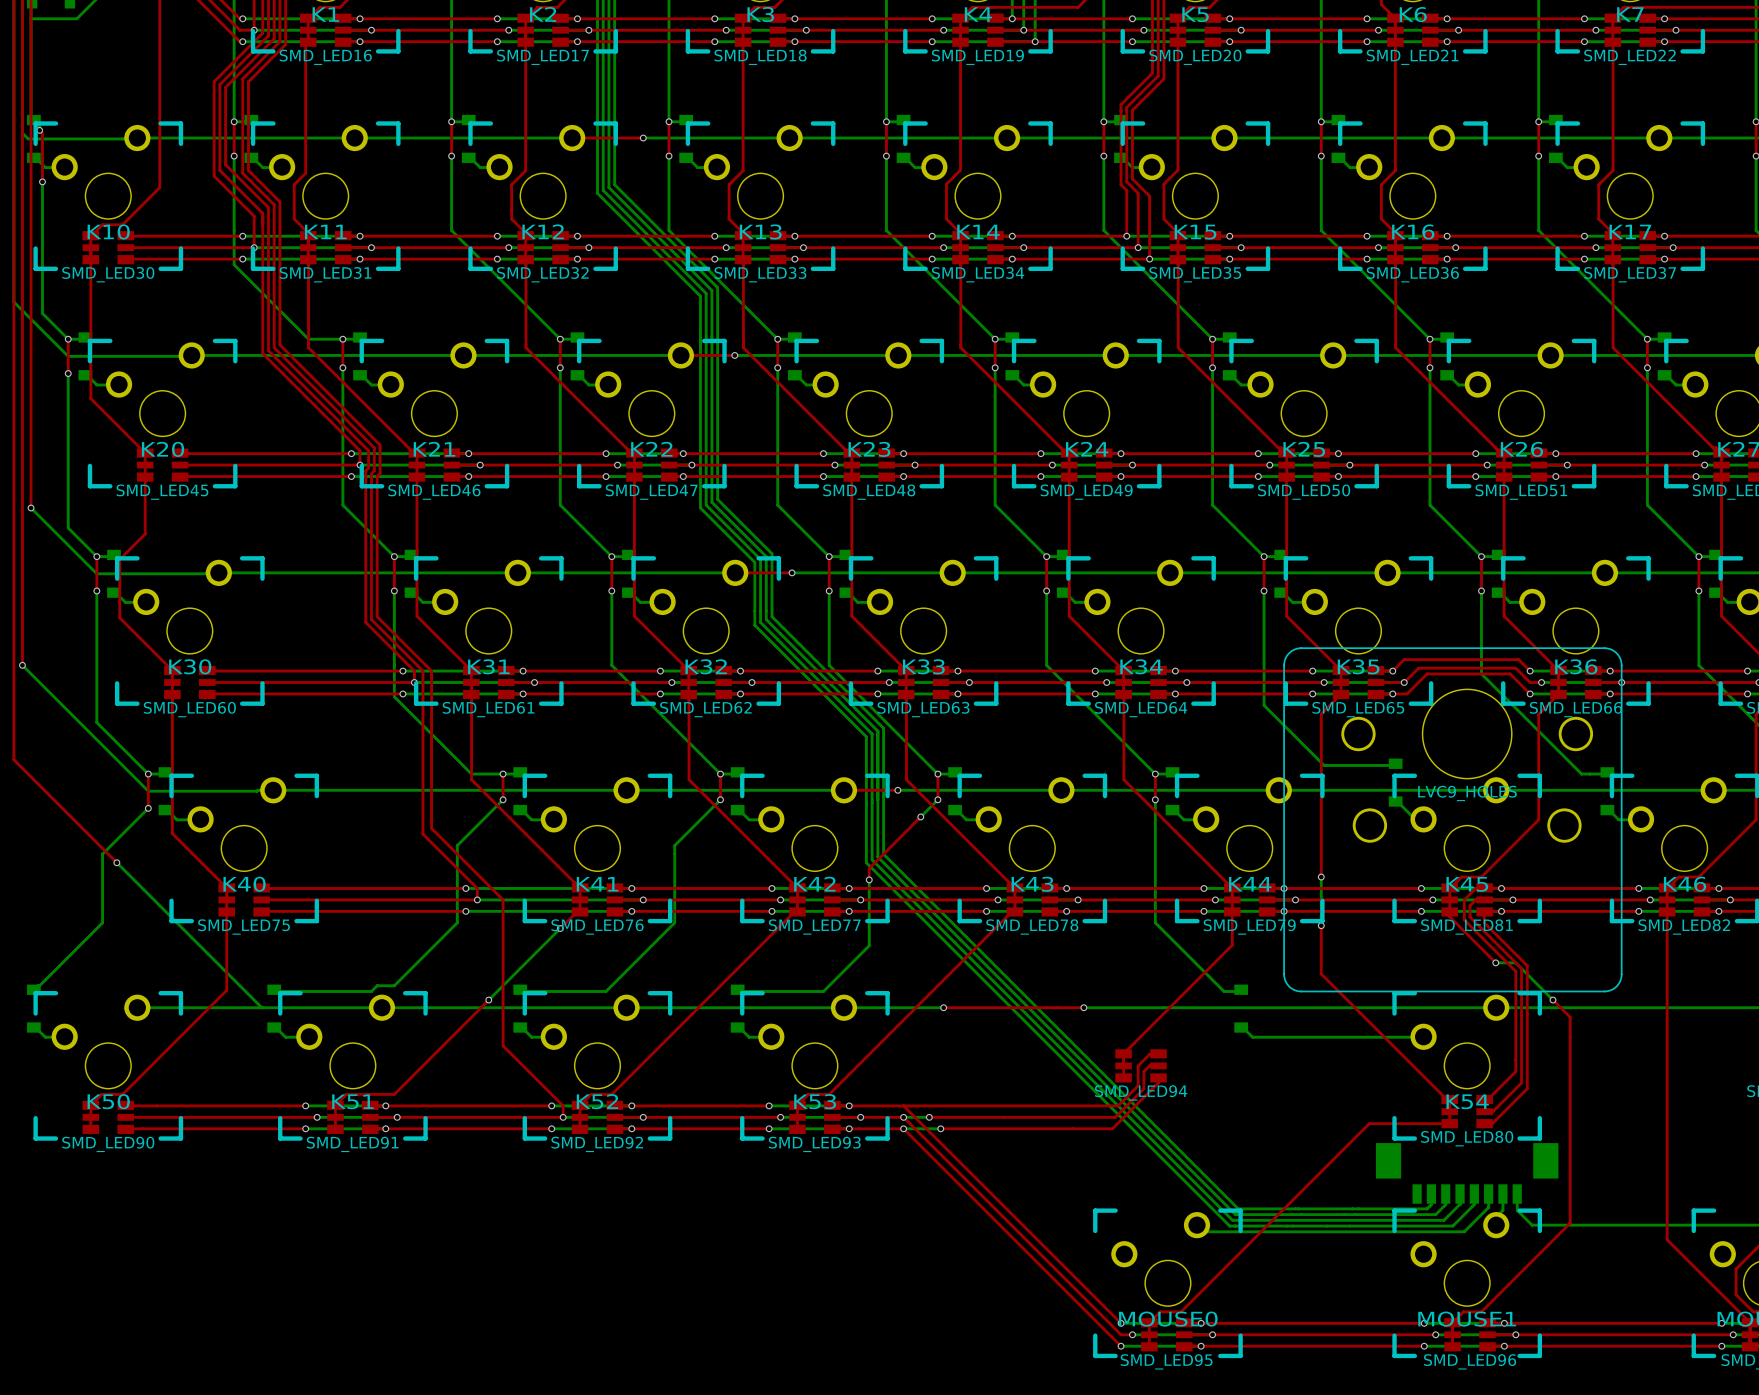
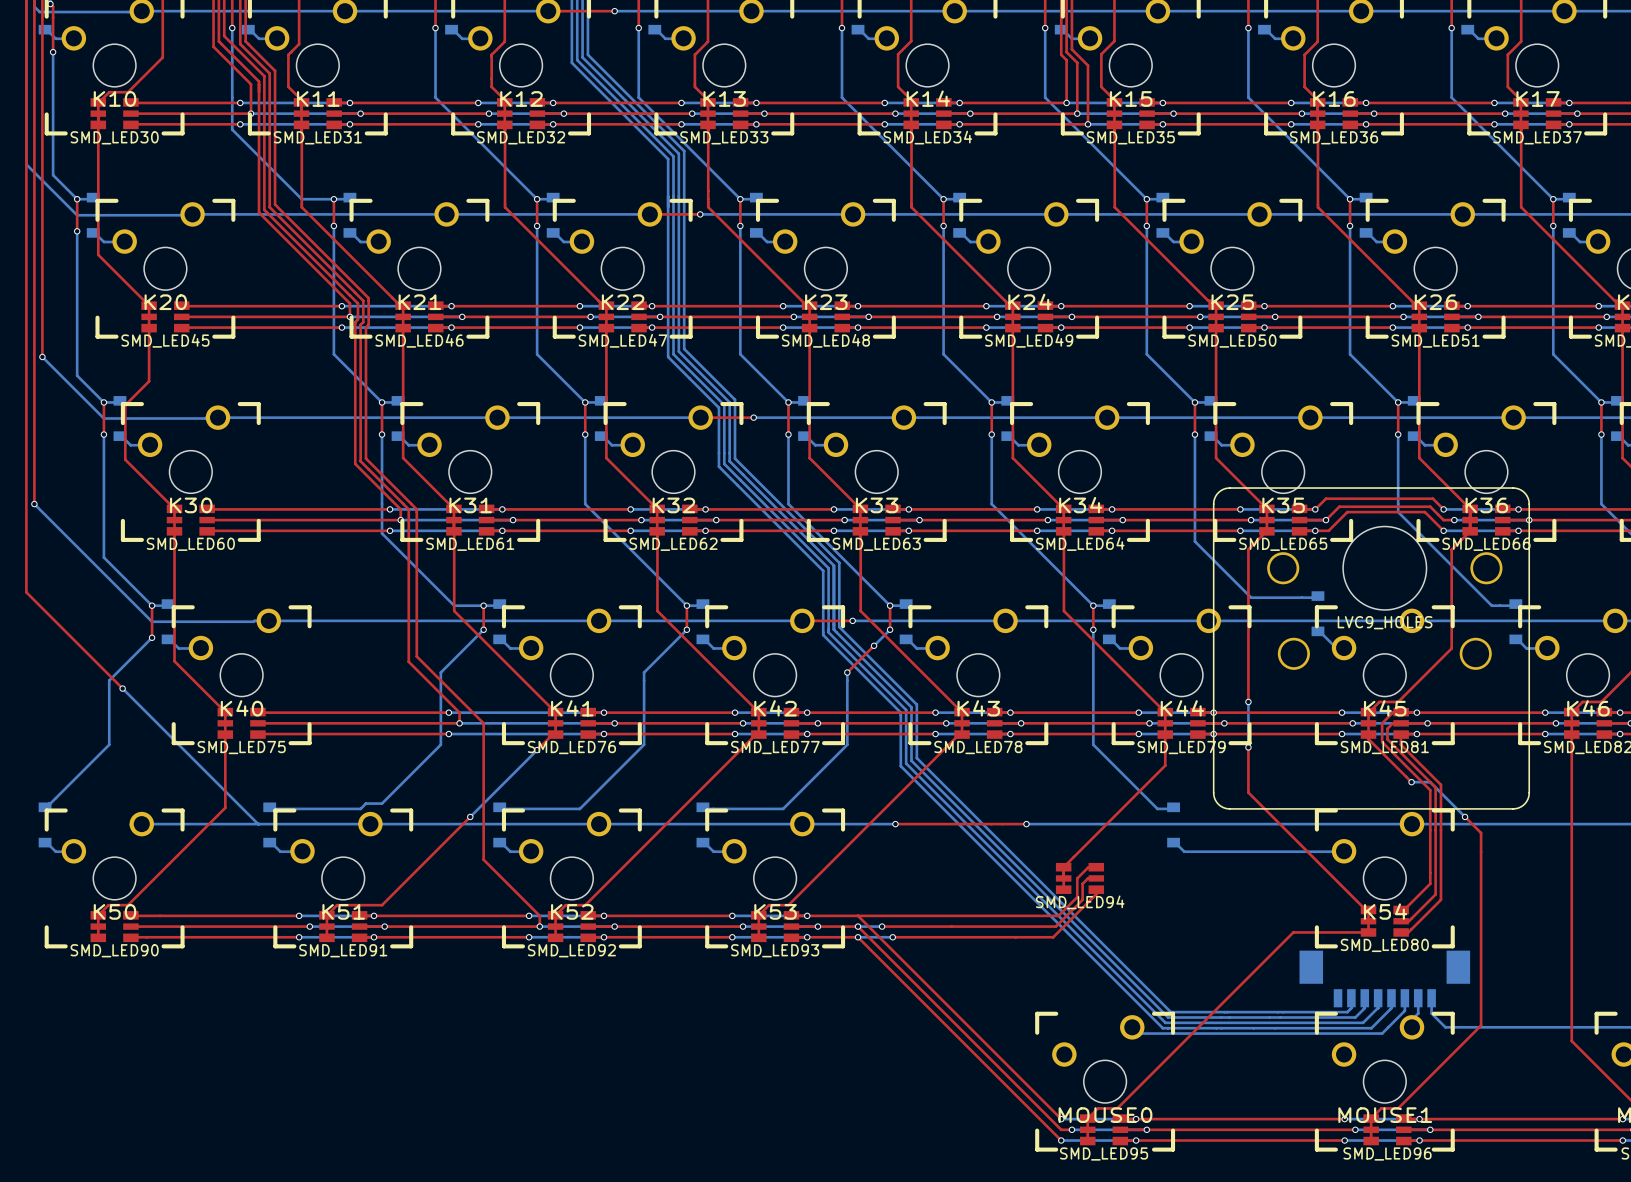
bottom track: (883, 796) (883, 854) (966, 937) -> (839, 627) (916, 704) (916, 758)
bottom track: (877, 799) (877, 857) (960, 939) -> (833, 629) (911, 707) (911, 760)
bottom track: (872, 802) (872, 859) (955, 942) -> (828, 632) (906, 709) (906, 763)
bottom track: (866, 805) (866, 862) (949, 945) -> (823, 635) (900, 712) (900, 766)
top track: (892, 845) (869, 868) (869, 879) -> none
bottom track: (869, 879) (869, 945) -> (847, 672) (847, 744) (825, 766)
via position: (869, 879) -> (847, 672)

